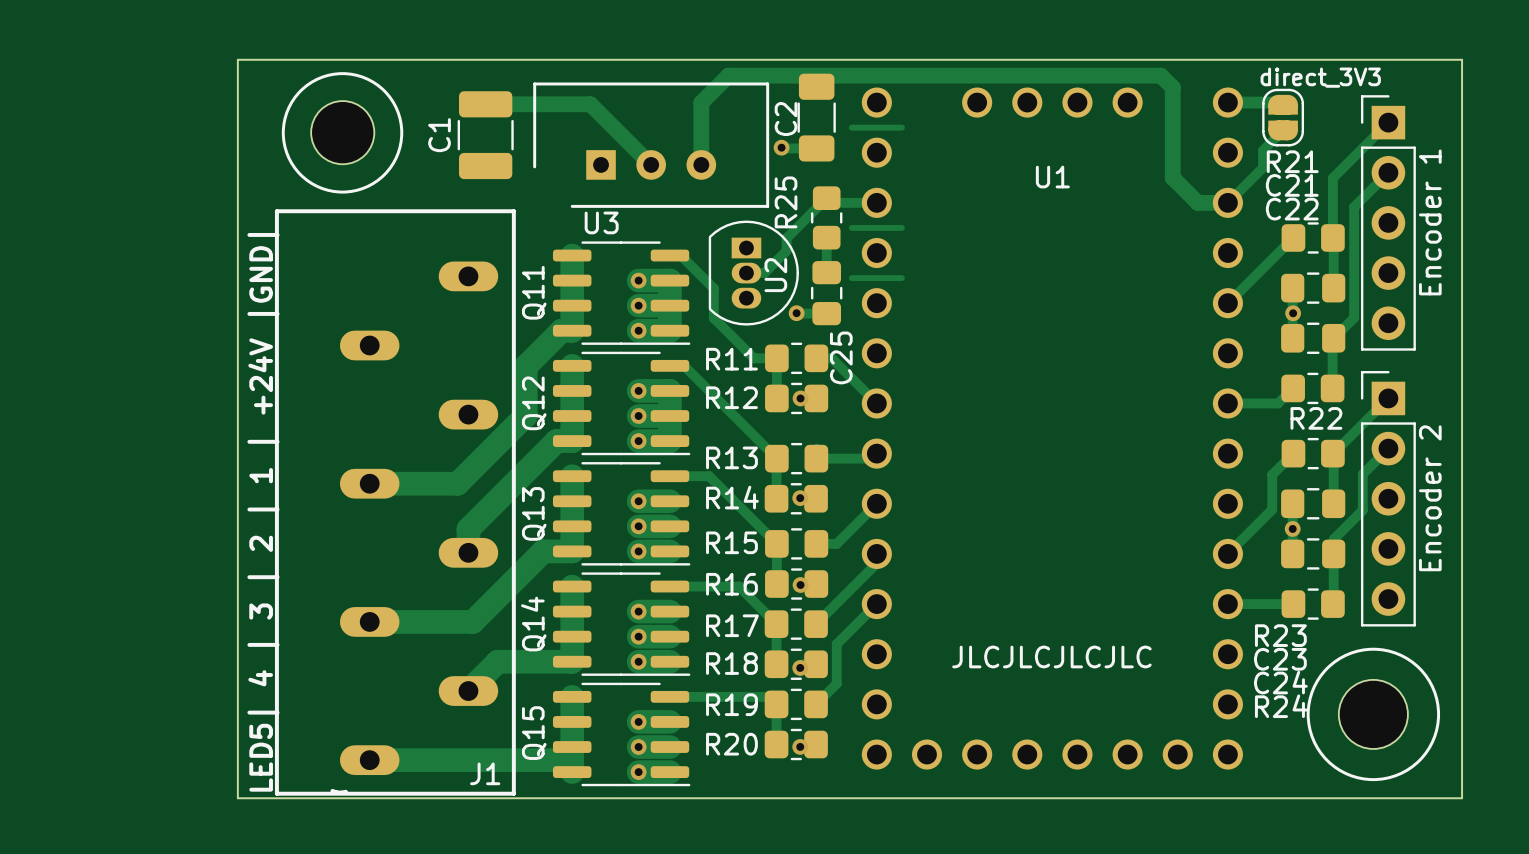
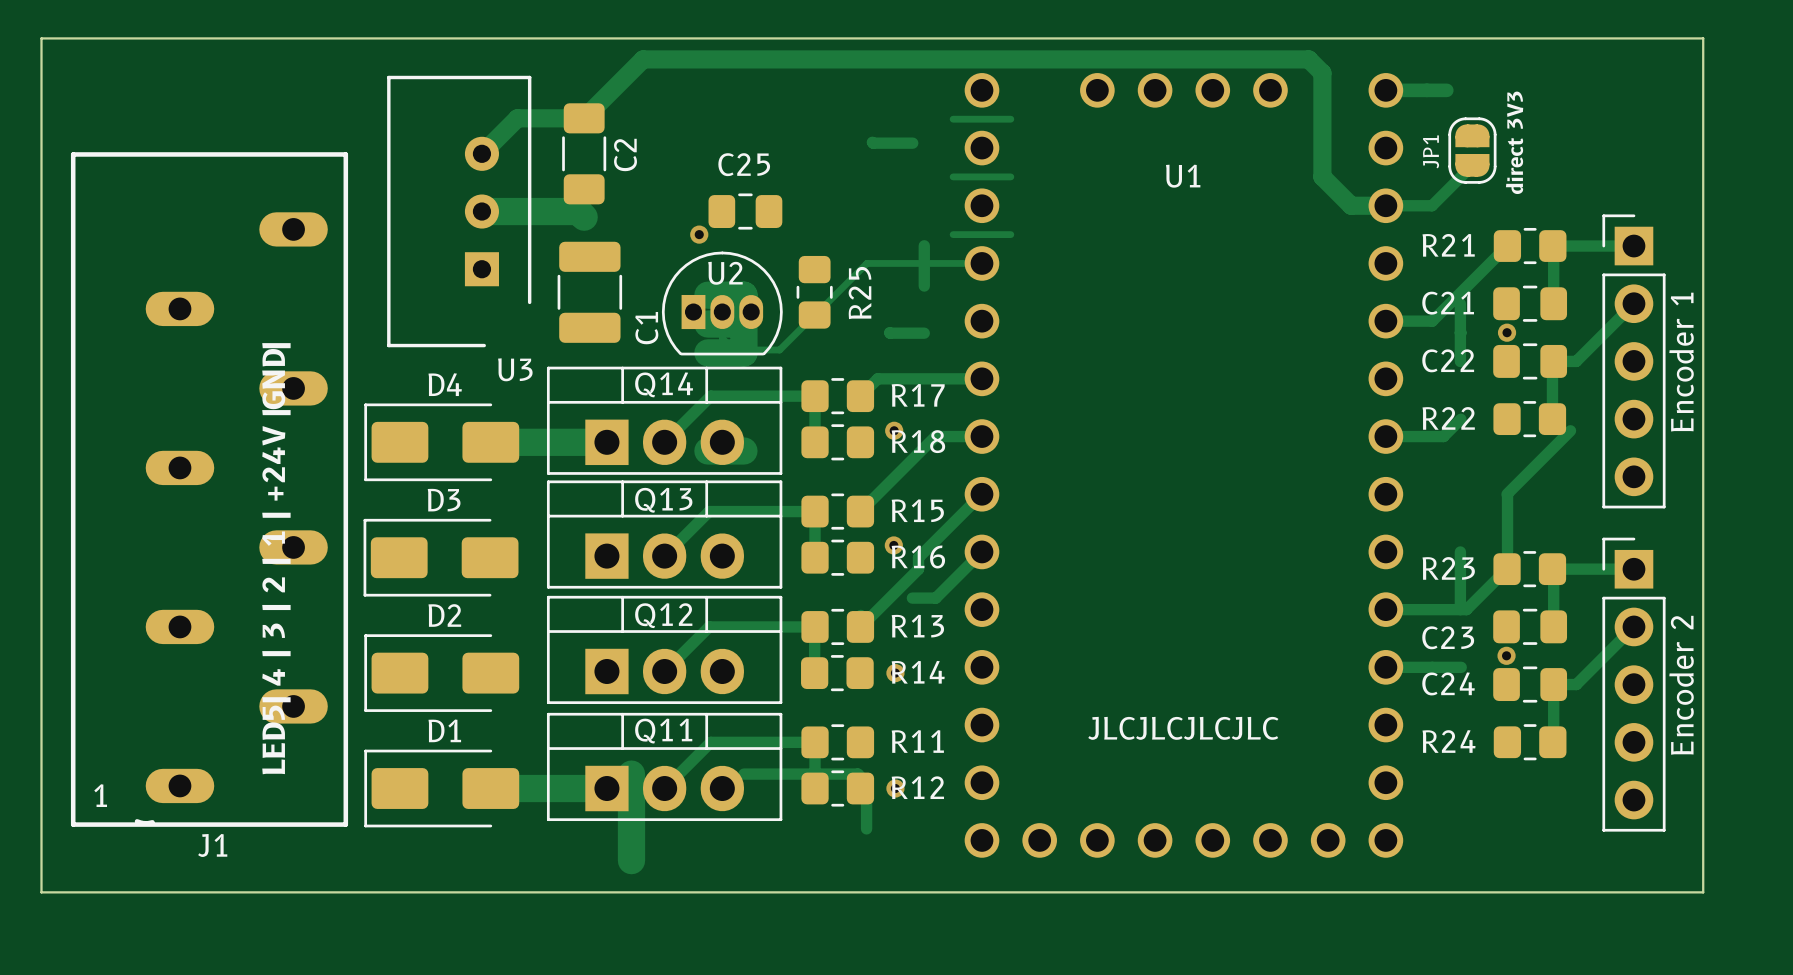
board edge: (237, 59) (1462, 59) (1462, 798) (237, 798) (237, 59) -> (41, 38) (41, 892) (1703, 892) (1703, 38) (41, 38)
drawing: [281, 72, 404, 194] -> none
track: (728, 75) (701, 102) (701, 164) -> (811, 59) (643, 59) (584, 118) (517, 118) (481, 153)
track: (485, 104) (590, 104) (651, 164) -> none
C2 position: (816, 117) -> (584, 153)
part: direct_3V3 (1283, 117) -> none
C2 name position: C2 (786, 119) -> C2 (625, 154)
track: (1388, 122) (1332, 178) (1333, 288) -> none
track: (1283, 130) (1263, 150) (1263, 167) (1227, 202) -> (1472, 165) (1432, 205) (1385, 205)
part: (342, 132) -> none
C1 name position: C1 (439, 135) -> C1 (646, 328)
C1 position: (485, 135) -> (589, 292)
U3 rotation: 0° (651, 145) -> 90° counterclockwise (459, 211)
U3 position: (651, 145) -> (459, 211)
via: (781, 147) -> none
JP1: none -> direct 3V3 (1472, 150)
R21 name position: R21 (1292, 161) -> R21 (1448, 245)
track: (1388, 172) (1354, 207) (1354, 317) (1332, 339) (1332, 388) -> none
C21 name position: C21 (1292, 185) -> C21 (1448, 303)
R25 name position: R25 (786, 202) -> R25 (859, 293)
track: (876, 202) (831, 202) (826, 198) (786, 238) (786, 250) (764, 273) (746, 273) -> none
track: none -> (481, 211) (578, 211) (584, 217)
C22 name position: C22 (1292, 209) -> C22 (1448, 360)
R25 position: (826, 217) -> (814, 292)
U3 name position: U3 (601, 222) -> U3 (515, 369)
part position: (1388, 222) -> (1633, 361)
via: none -> (699, 234)
track: (1293, 237) (1228, 303) -> (1507, 246) (1432, 321) (1386, 321)
R21 position: (1313, 237) -> (1530, 246)
track: none -> (1633, 246) (1552, 246) (1553, 303)
Q11 footprint: [552, 241, 691, 345] -> [546, 712, 783, 822]
track: none -> (981, 263) (866, 263) (779, 350) (733, 350) (722, 338) (722, 312)
track: (572, 255) (572, 330) (561, 330) (525, 366) (525, 415) (457, 483) (369, 483) -> none
track: (669, 255) (680, 255) (713, 288) (713, 318) (753, 358) (776, 358) (776, 398) -> none
U2 rotation: 0° (753, 273) -> 90° counterclockwise (722, 303)
U2 position: (753, 273) -> (722, 303)
track: (851, 278) (901, 278) -> (953, 176) (1010, 176)
via: (638, 280) -> none
C21 position: (1313, 288) -> (1530, 303)
track: none -> (1633, 303) (1576, 361) (1552, 362) (1552, 419)
Q11 name position: Q11 (534, 292) -> Q11 (663, 731)
C25 rotation: 0° (826, 293) -> 90° clockwise (745, 211)
C25 position: (826, 293) -> (745, 211)
via: (638, 305) -> none
via: (796, 313) -> none
via position: (1293, 313) -> (1507, 332)
via: (638, 330) -> none
C22 position: (1313, 338) -> (1530, 361)
Q12 footprint: [552, 351, 691, 456] -> [546, 595, 783, 705]
track: none -> (981, 378) (877, 378) (860, 396)
C25 name position: C25 (841, 357) -> C25 (744, 164)
R11 position: (796, 358) -> (837, 742)
track: (816, 358) (831, 358) (876, 403) -> (860, 511) (935, 436) (981, 436)
R11 name position: R11 (731, 359) -> R11 (917, 741)
track: (572, 365) (572, 441) (556, 441) (468, 529) (468, 552) -> none
track: (669, 365) (684, 365) (776, 458) (776, 498) -> none
R22 position: (1312, 388) -> (1529, 419)
track: (638, 390) (669, 390) (669, 441) (638, 441) -> none
via: (638, 390) -> none
R12 name position: R12 (731, 397) -> R12 (917, 787)
R12 position: (796, 398) -> (837, 788)
Q12 name position: Q12 (534, 403) -> Q12 (663, 615)
D4: none -> (441, 442)
track: none -> (490, 442) (606, 442)
track: none -> (664, 442) (710, 396) (815, 396) (815, 442)
via: (638, 416) -> none
R22 name position: R22 (1316, 418) -> R22 (1448, 418)
via: (638, 441) -> none
track: (1388, 448) (1362, 474) (1362, 510) (1333, 539) (1333, 603) -> none
track: (1293, 453) (1272, 474) (1272, 509) (1227, 553) -> (1507, 569) (1466, 609) (1385, 609)
R23 position: (1313, 453) -> (1529, 569)
R13 name position: R13 (731, 457) -> R13 (917, 626)
R13 position: (796, 458) -> (837, 626)
track: (816, 458) (871, 458) -> (860, 615) (860, 626) (918, 569) (918, 557) (976, 500)
Q13 footprint: [552, 462, 691, 566] -> [546, 480, 783, 589]
track: (572, 476) (572, 551) (543, 551) (472, 621) (369, 621) -> none
track: (669, 476) (709, 476) (776, 543) (776, 584) -> none
R14 name position: R14 (732, 497) -> R14 (918, 672)
R14 position: (796, 498) -> (837, 673)
part position: (1388, 498) -> (1633, 684)
track: (638, 501) (669, 501) -> none
via: (638, 501) -> none
J1 position: (395, 502) -> (209, 489)
C23 position: (1313, 503) -> (1530, 626)
track: none -> (664, 556) (709, 511) (815, 511) (815, 557)
D3: none -> (441, 557)
Q13 name position: Q13 (534, 513) -> Q13 (663, 500)
track: none -> (1633, 569) (1552, 569) (1553, 626)
track: (638, 526) (669, 526) -> none
via: (638, 526) -> none
via position: (1292, 528) -> (1506, 655)
R15 name position: R15 (731, 542) -> R15 (917, 510)
R15 position: (796, 543) -> (837, 511)
track: (638, 551) (669, 551) -> none
via: (638, 551) -> none
track: (876, 553) (876, 563) (816, 624) -> none
C24 position: (1313, 553) -> (1530, 684)
track: none -> (1633, 626) (1576, 684) (1553, 684) (1552, 742)
Q14 footprint: [552, 572, 691, 676] -> [546, 366, 783, 475]
R16 name position: R16 (731, 584) -> R16 (918, 556)
R16 position: (796, 584) -> (837, 557)
via position: (800, 585) -> (895, 673)
track: (572, 586) (572, 661) (497, 661) (468, 691) -> none
track: (669, 586) (738, 586) (776, 624) (776, 664) -> none
track: (876, 604) (836, 644) (836, 683) (816, 704) -> none
R24 position: (1313, 604) -> (1530, 742)
track: none -> (664, 671) (709, 626) (815, 626) (814, 673)
D2: none -> (441, 673)
track: (638, 611) (669, 611) -> none
via: (638, 611) -> none
Q14 name position: Q14 (533, 624) -> Q14 (664, 384)
R17 position: (796, 624) -> (837, 396)
R17 name position: R17 (732, 625) -> R17 (918, 395)
R23 name position: R23 (1280, 635) -> R23 (1448, 568)
track: (638, 636) (669, 636) -> none
via: (638, 636) -> none
drawing: [1306, 647, 1441, 782] -> none
C23 name position: C23 (1280, 659) -> C23 (1448, 637)
track: (638, 661) (669, 661) -> none
via: (638, 661) -> none
R18 name position: R18 (731, 663) -> R18 (918, 441)
R18 position: (796, 664) -> (837, 442)
via: (800, 667) -> none
C24 name position: C24 (1280, 682) -> C24 (1448, 683)
R19: (796, 704) -> none
R24 name position: R24 (1281, 706) -> R24 (1449, 741)
D1: none -> (441, 788)
track: none -> (490, 788) (606, 788)
track: none -> (664, 788) (710, 742) (815, 742) (815, 788)
via: none -> (895, 788)
part: (1373, 714) -> none
J1 text: none -> 1 (100, 795)
track: (638, 721) (669, 721) -> none
via: (638, 721) -> none
Q15: (621, 734) -> none
R20: (796, 744) -> none
via: (800, 746) -> none
track: (572, 747) (559, 760) (369, 760) -> none
track: (638, 747) (669, 747) -> none
via: (638, 747) -> none
track: (638, 772) (669, 772) -> none
via: (638, 772) -> none
J1 name position: J1 (485, 773) -> J1 (212, 845)

